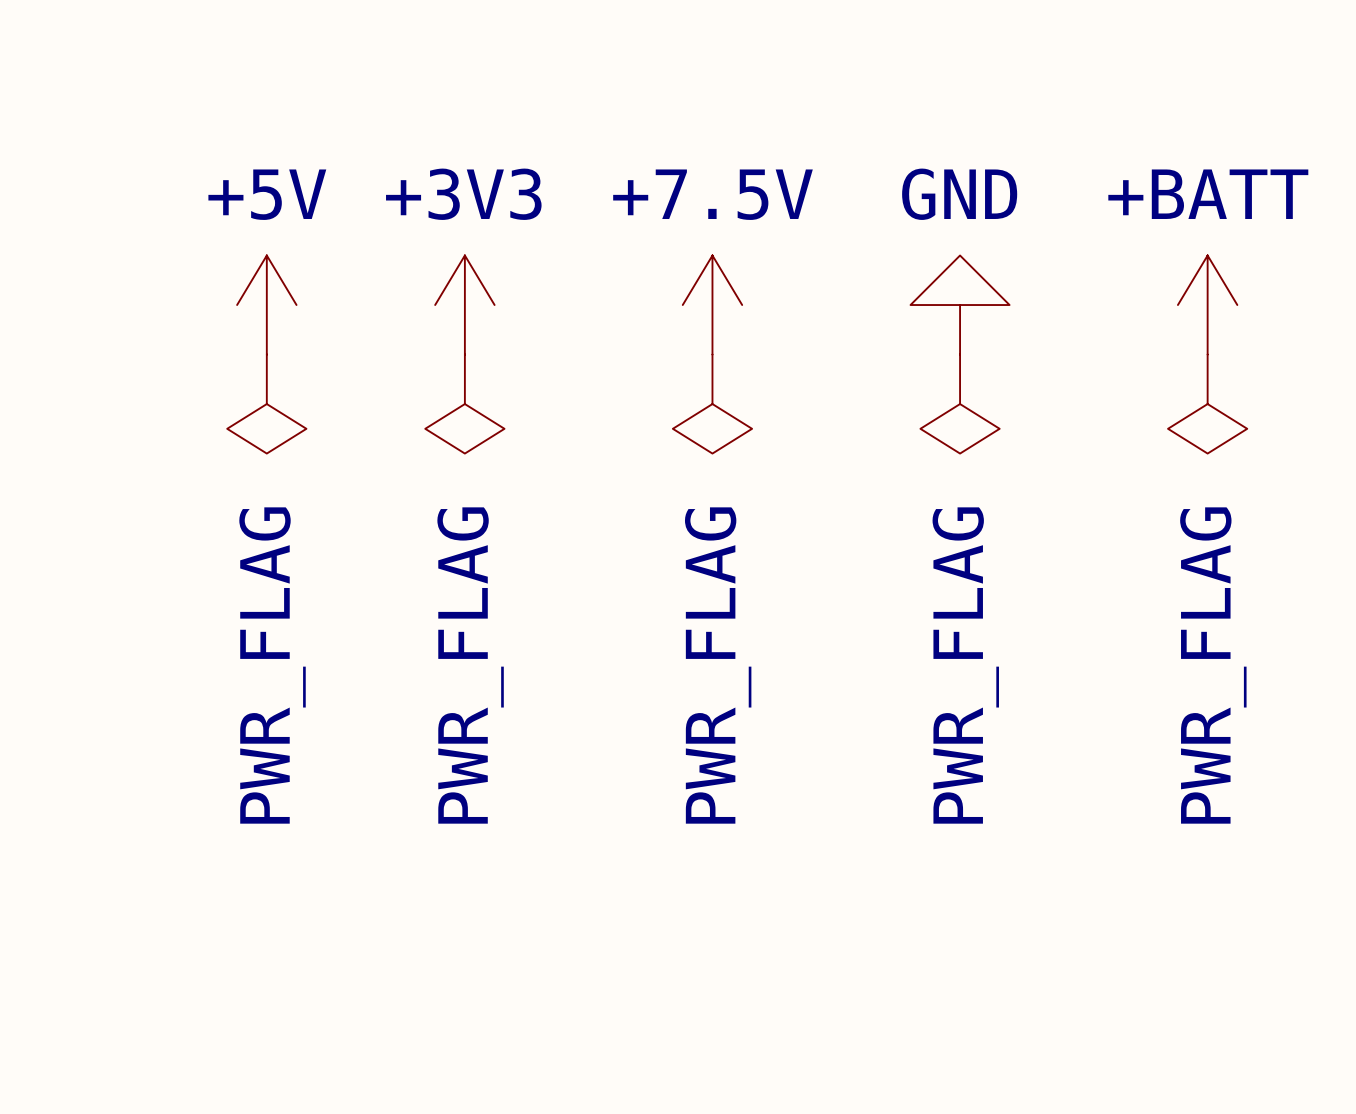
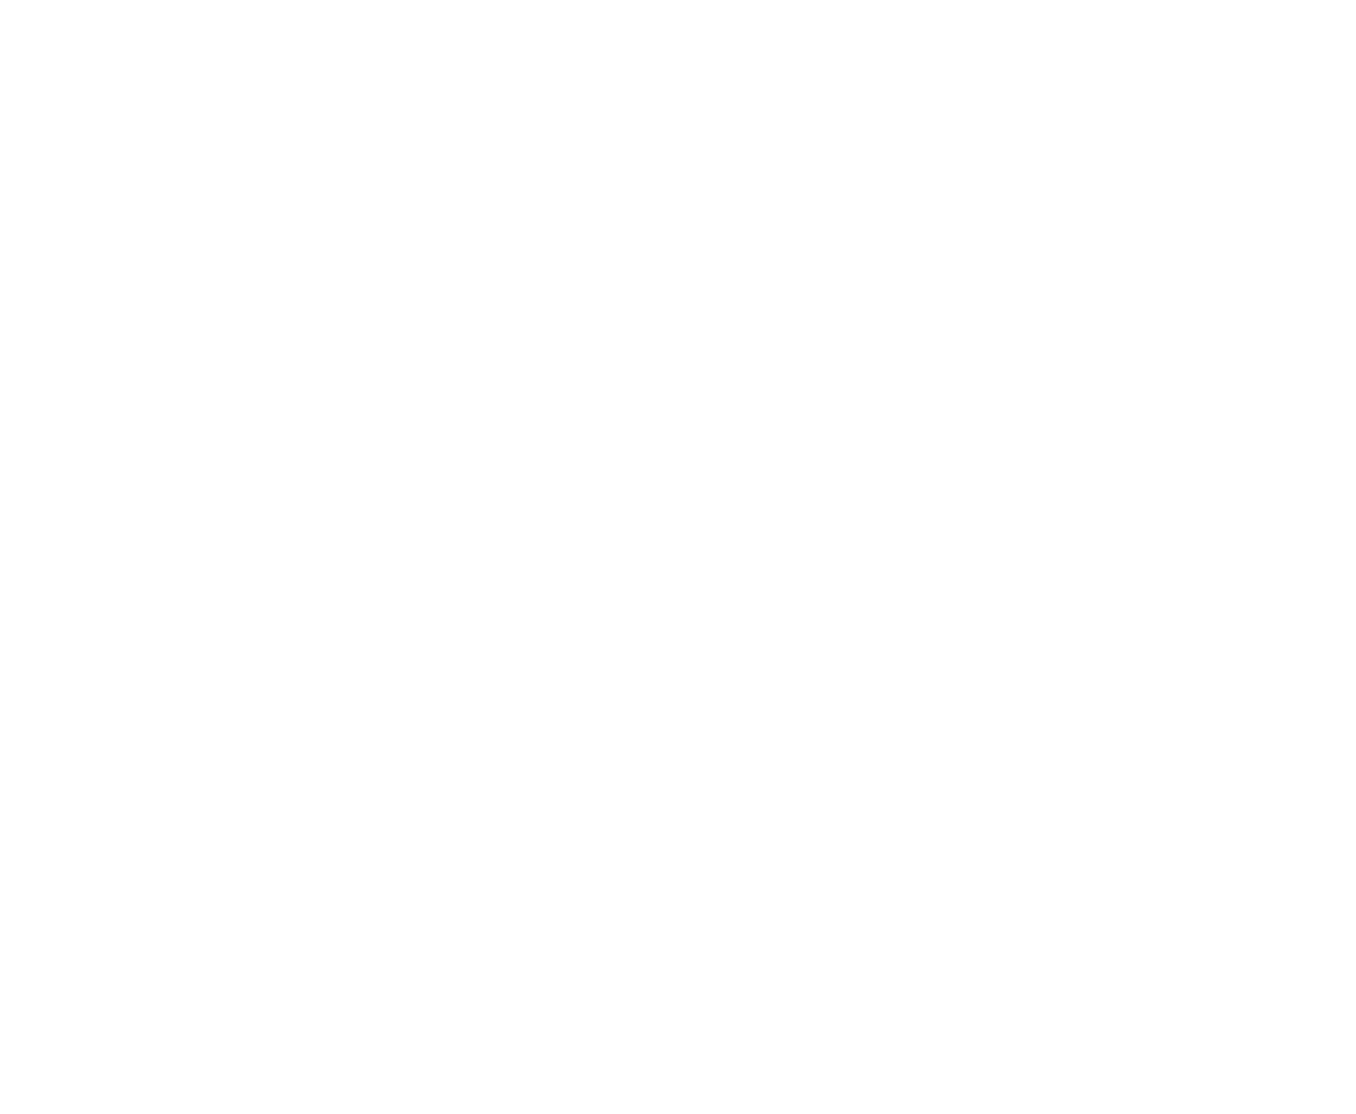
power symbol: +5V (266, 305) -> none
power symbol: +3V3 (464, 305) -> none
power symbol: +7.5V (712, 305) -> none
power symbol: GND (960, 305) -> none
power symbol: +BATT (1207, 305) -> none
power symbol: PWR_FLAG (266, 404) -> none
power symbol: PWR_FLAG (464, 404) -> none
power symbol: PWR_FLAG (712, 404) -> none
power symbol: PWR_FLAG (960, 404) -> none
power symbol: PWR_FLAG (1207, 404) -> none

